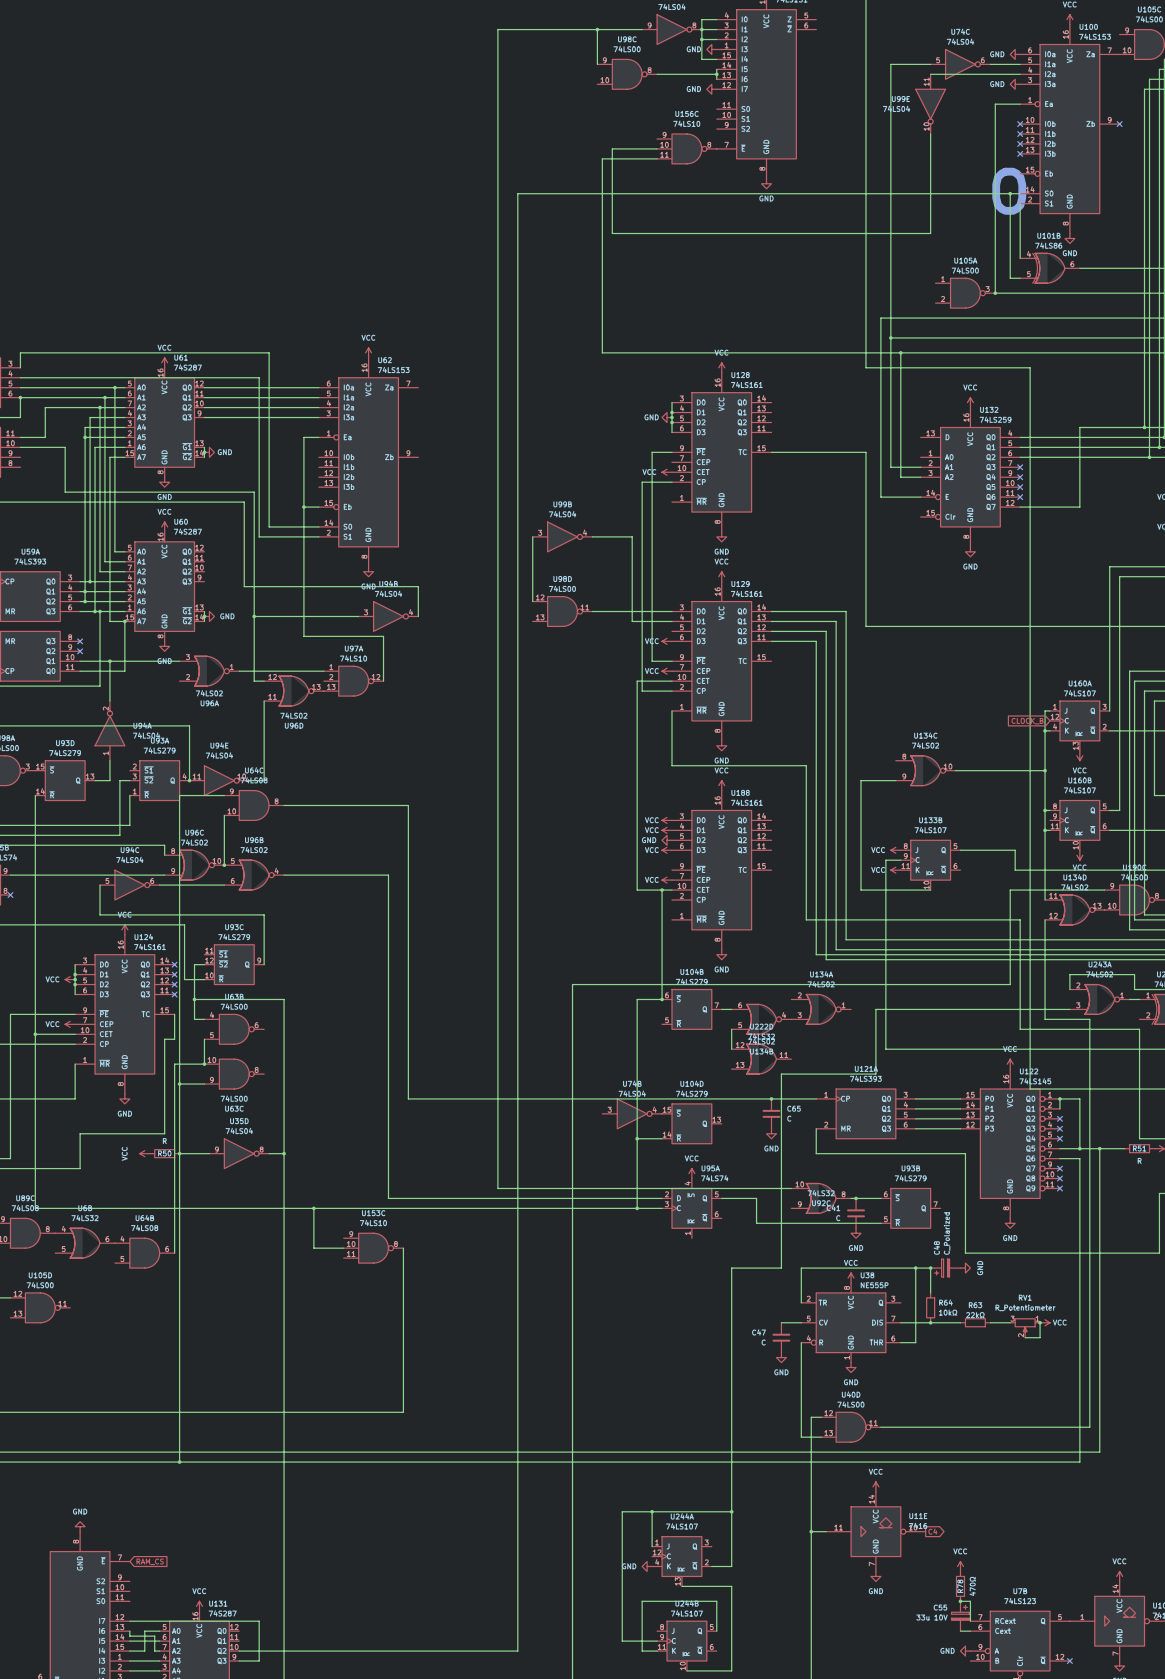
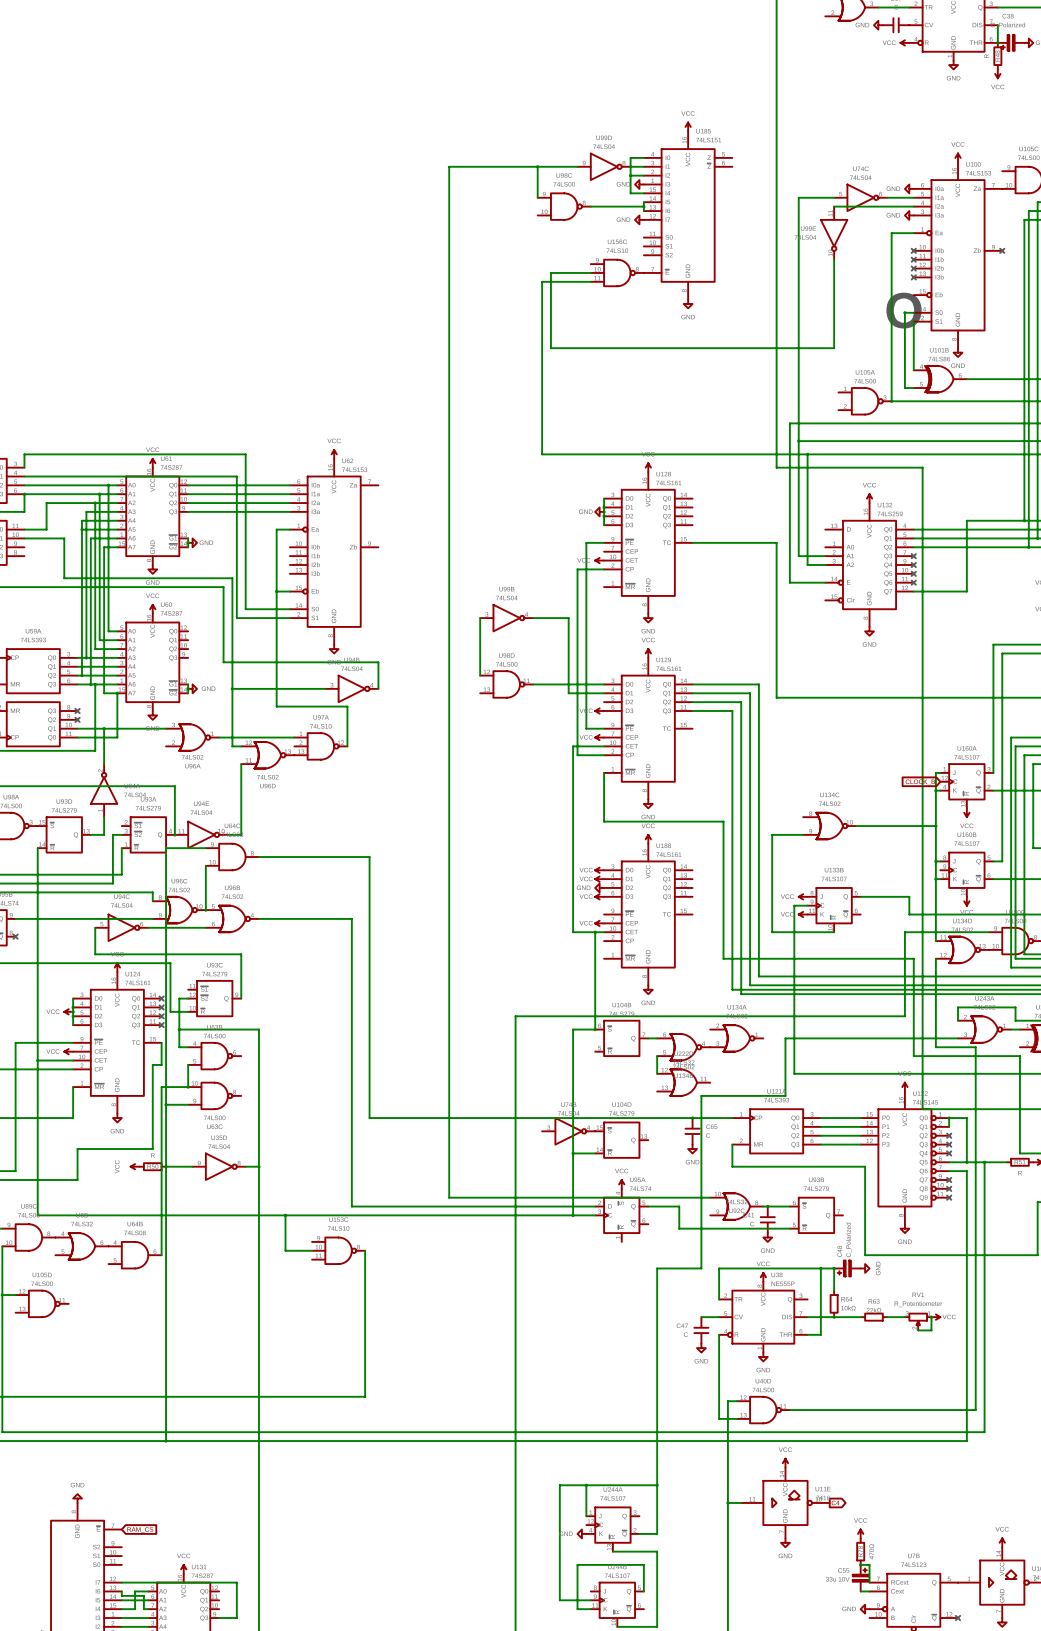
wire: (1010, 193) (517, 193) (517, 1651) (239, 1651) -> none

